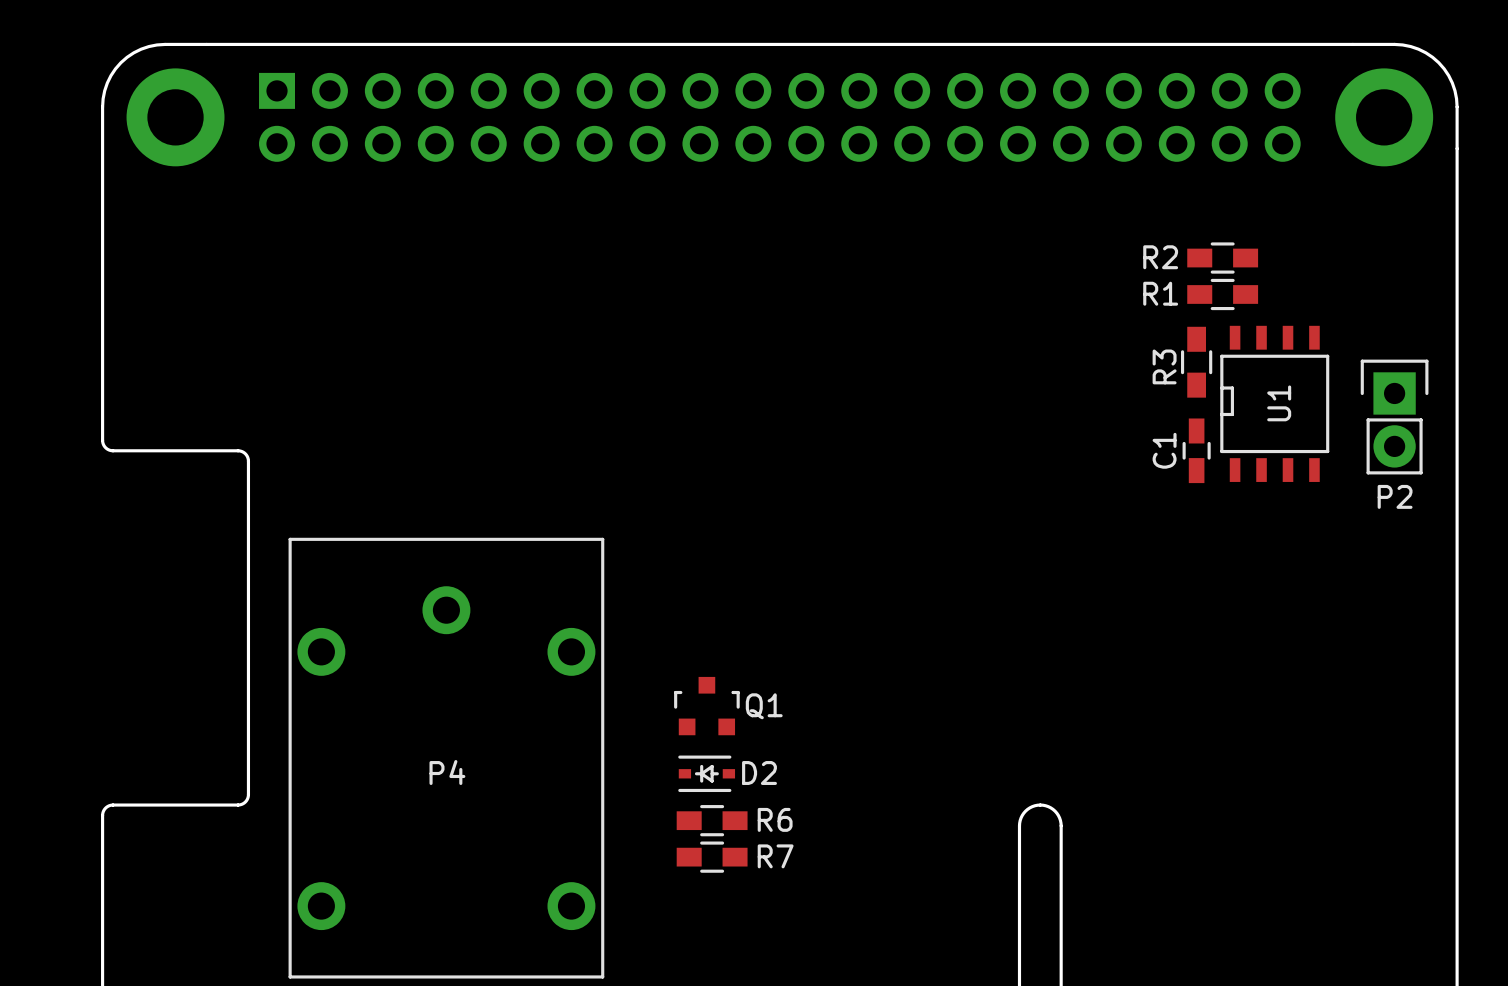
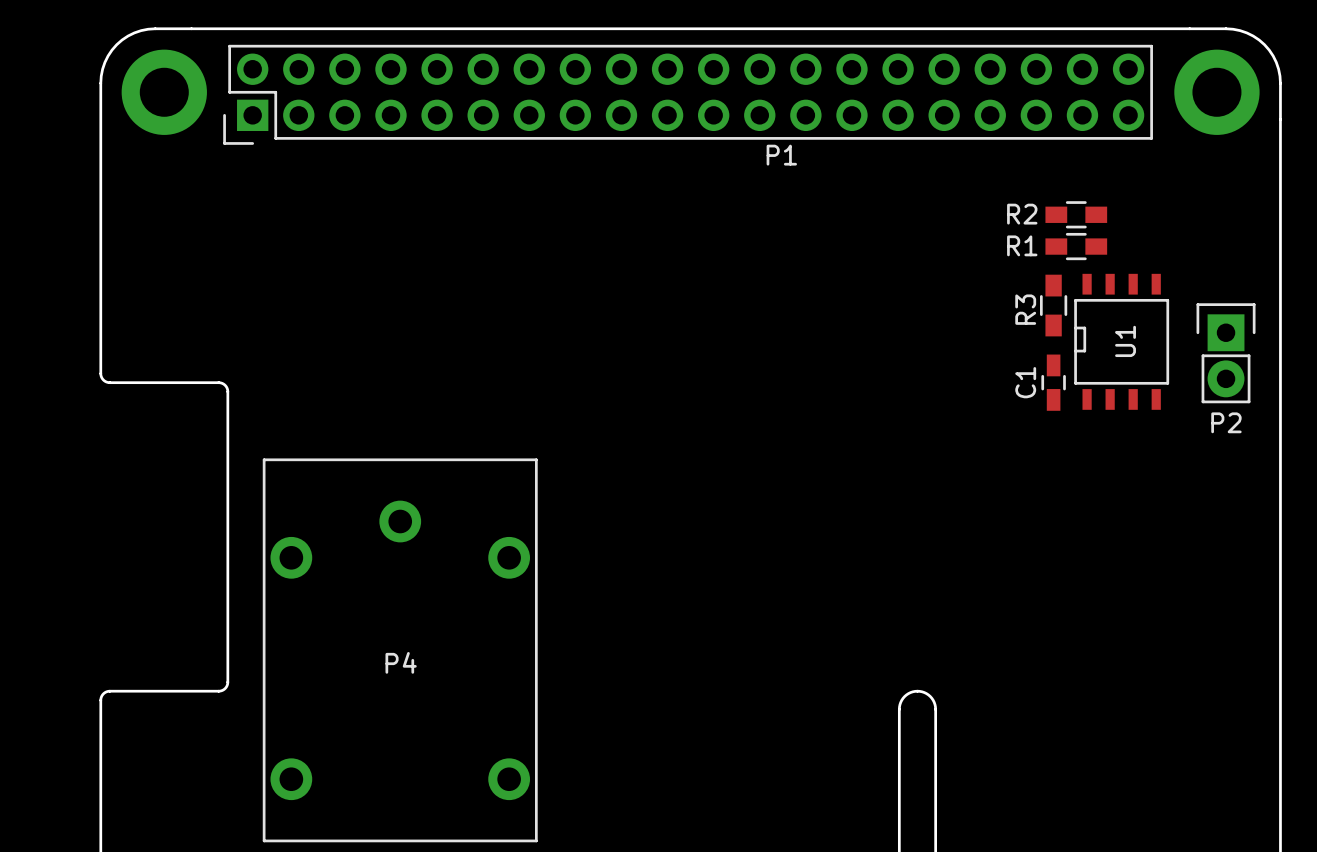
P1 side: bottom (779, 117) -> top (688, 94)
Q1: (706, 706) -> none
D2: (706, 773) -> none
R6: (712, 820) -> none
R7: (712, 857) -> none

